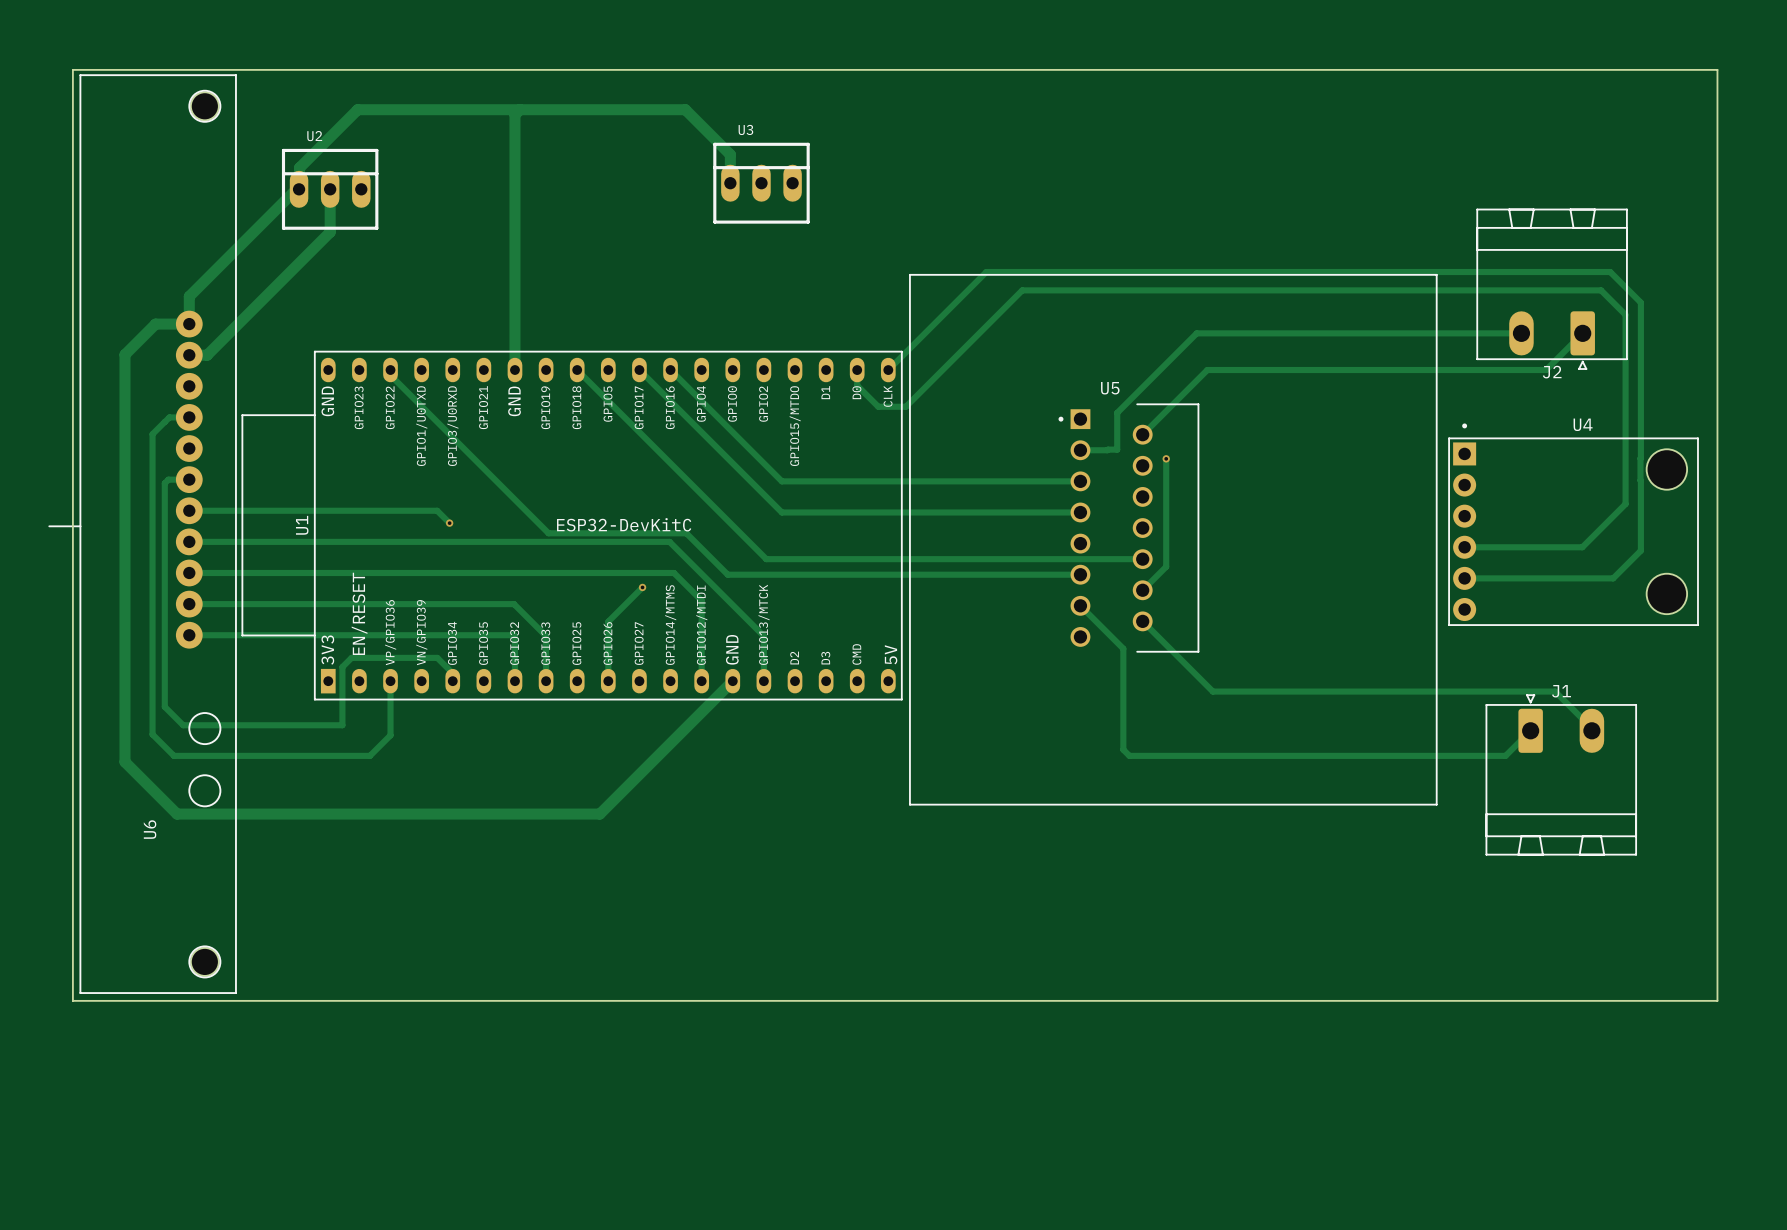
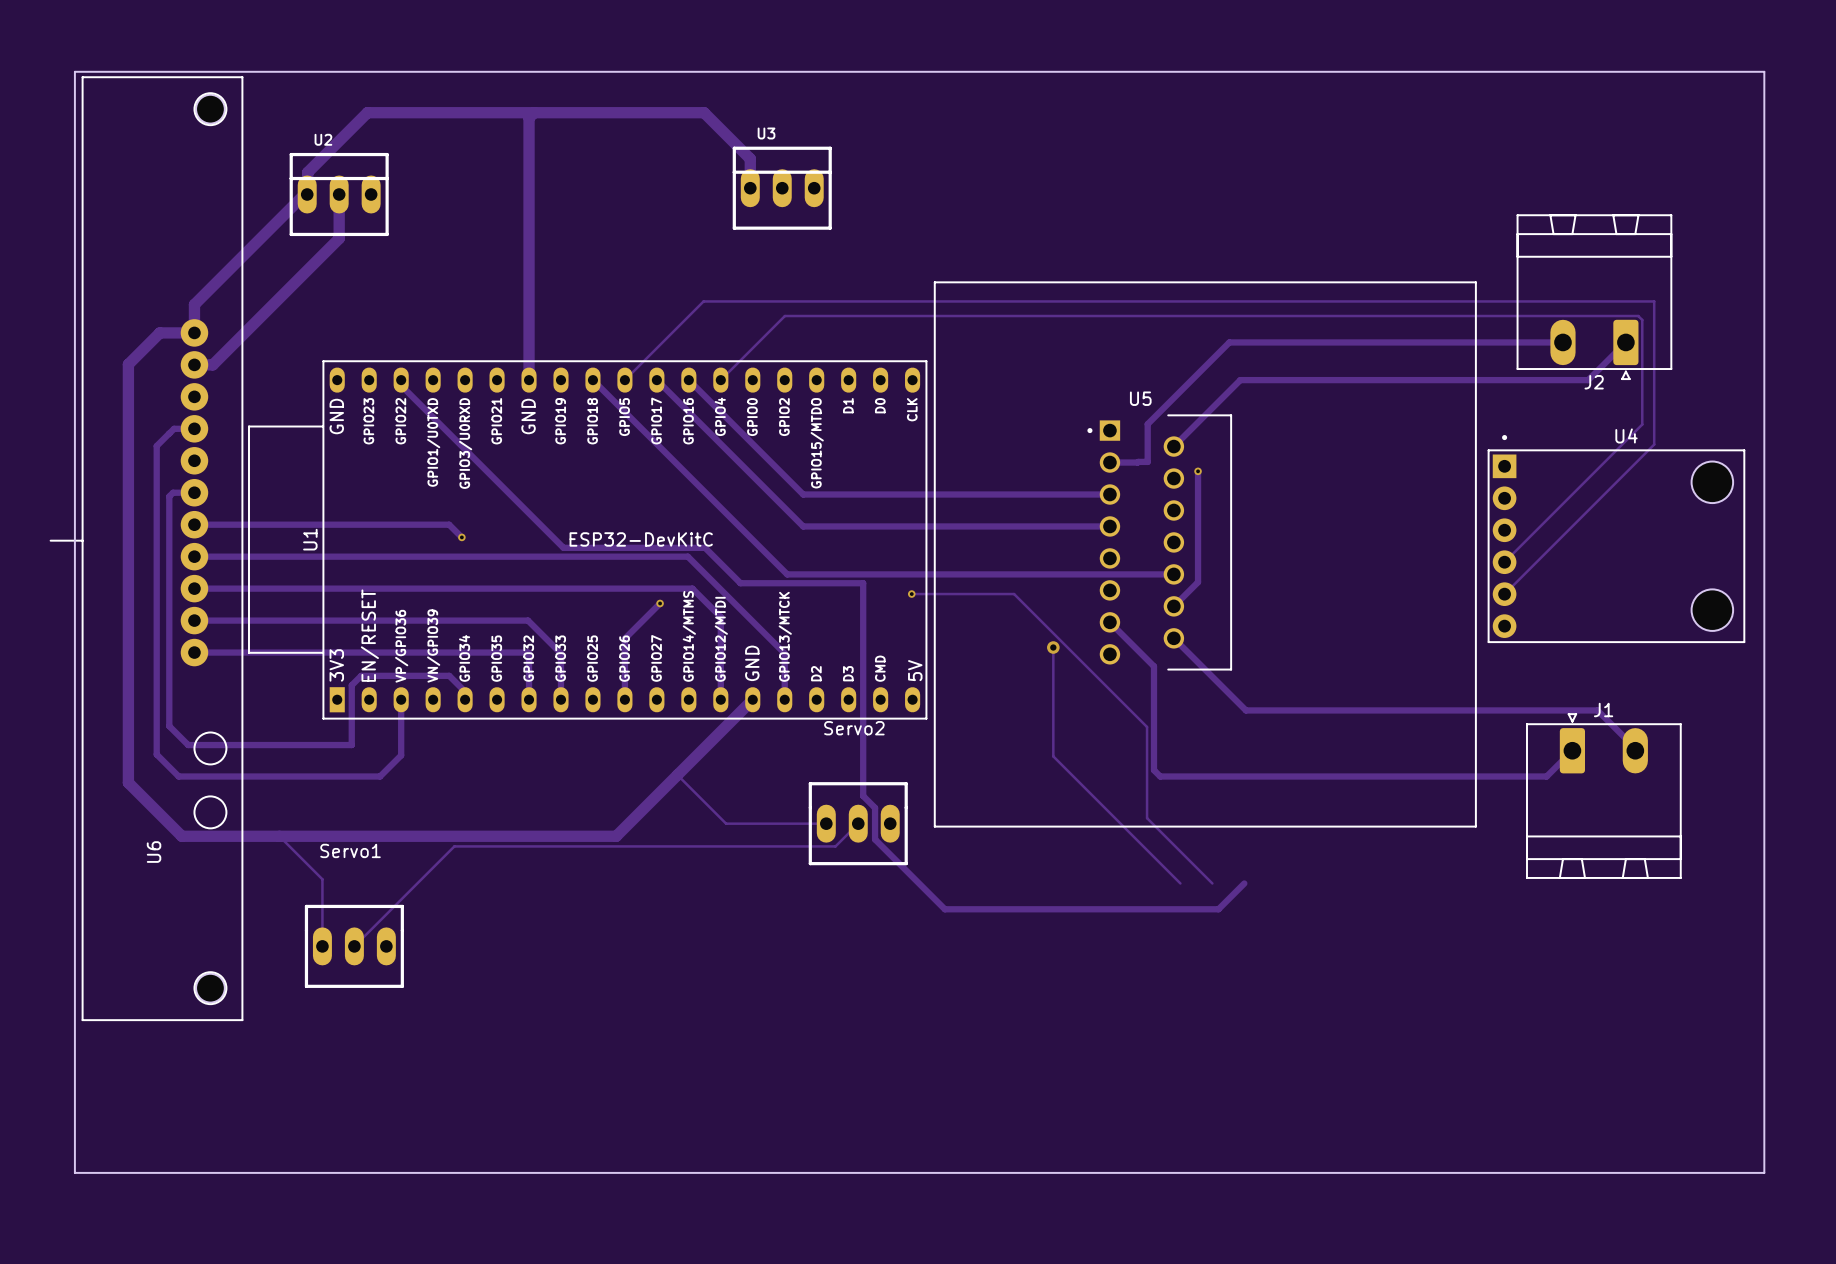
track: (857, 370) (857, 385) (878, 406) (905, 406) (1022, 290) (1601, 290) (1625, 314) (1625, 504) (1582, 547) (1464, 547) -> (720, 380) (784, 316) (1638, 316) (1642, 319) (1642, 424) (1504, 562)
track: (888, 370) (986, 272) (1610, 272) (1640, 302) (1640, 550) (1613, 578) (1464, 578) -> (624, 380) (703, 301) (1654, 301) (1654, 444) (1504, 594)
track: (720, 567) (727, 574) (1080, 574) -> (740, 583) (863, 583) (863, 796) (875, 807) (875, 839) (944, 909) (1218, 909) (1244, 883)
track: none -> (911, 594) (1014, 594) (1147, 727) (1147, 818) (1212, 883)
via: none -> (911, 594)
track: none -> (1053, 647) (1053, 756) (1180, 883)
via: none -> (1053, 647)
track: none -> (677, 775) (726, 823) (826, 823)
track: none -> (858, 823) (835, 846) (454, 846) (354, 946)
Servo2: none -> (858, 823)
track: none -> (279, 836) (322, 879) (322, 946)
Servo1: none -> (354, 946)
board edge: (72, 1000) (1717, 1000) -> (74, 1028) (74, 1172) (1764, 1172) (1764, 1028)

